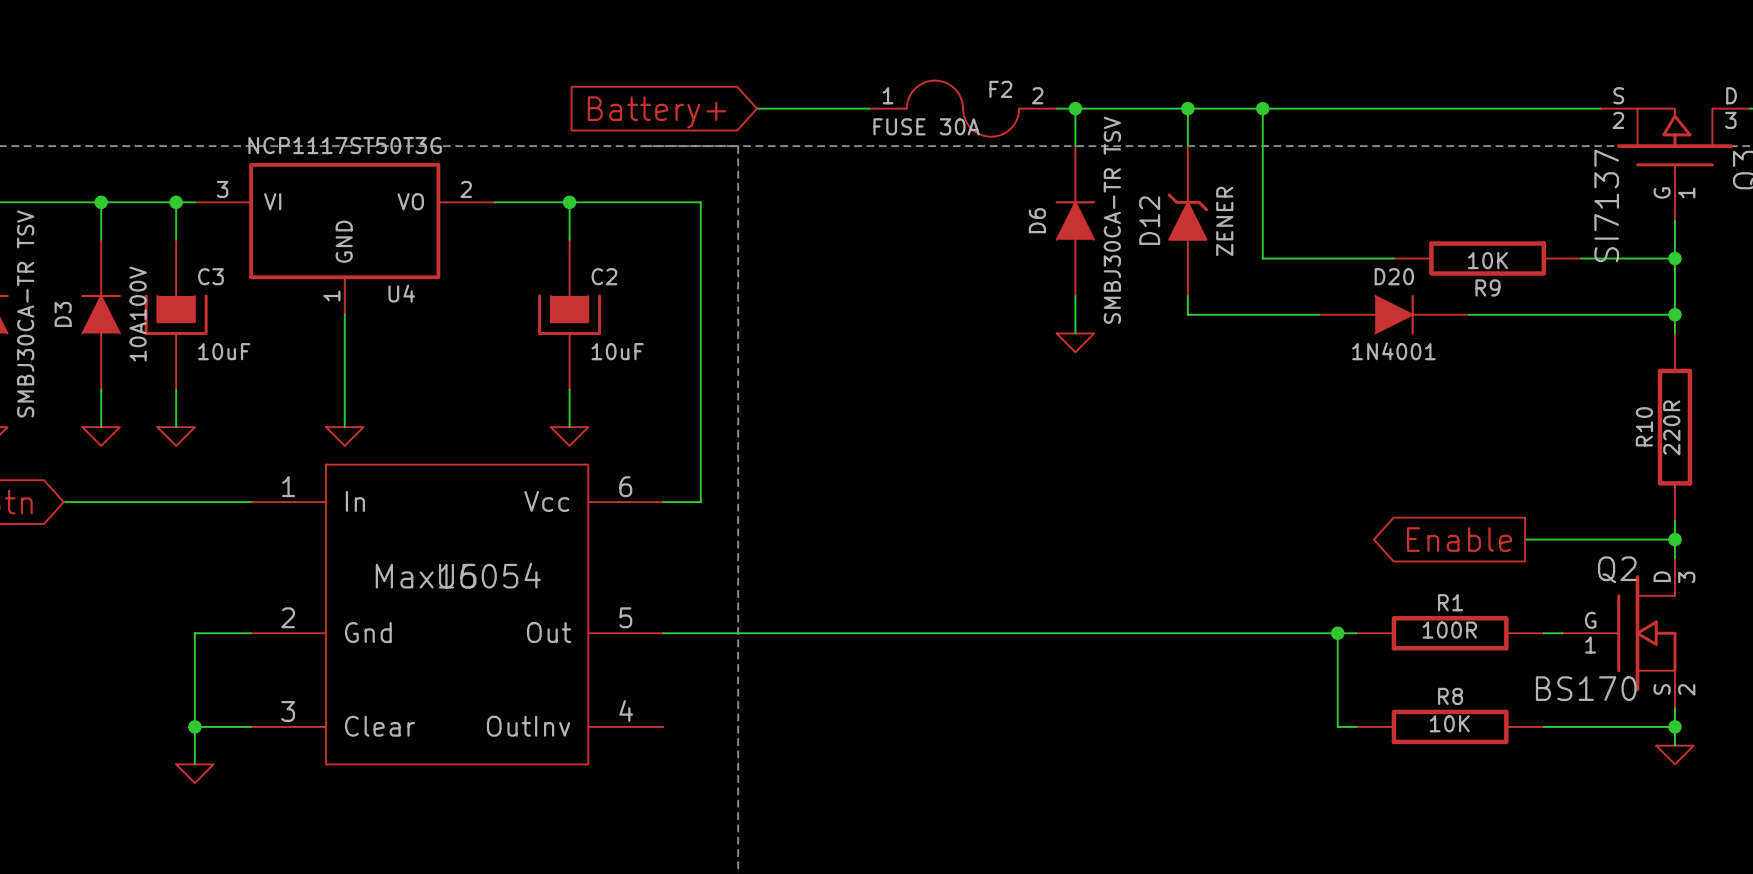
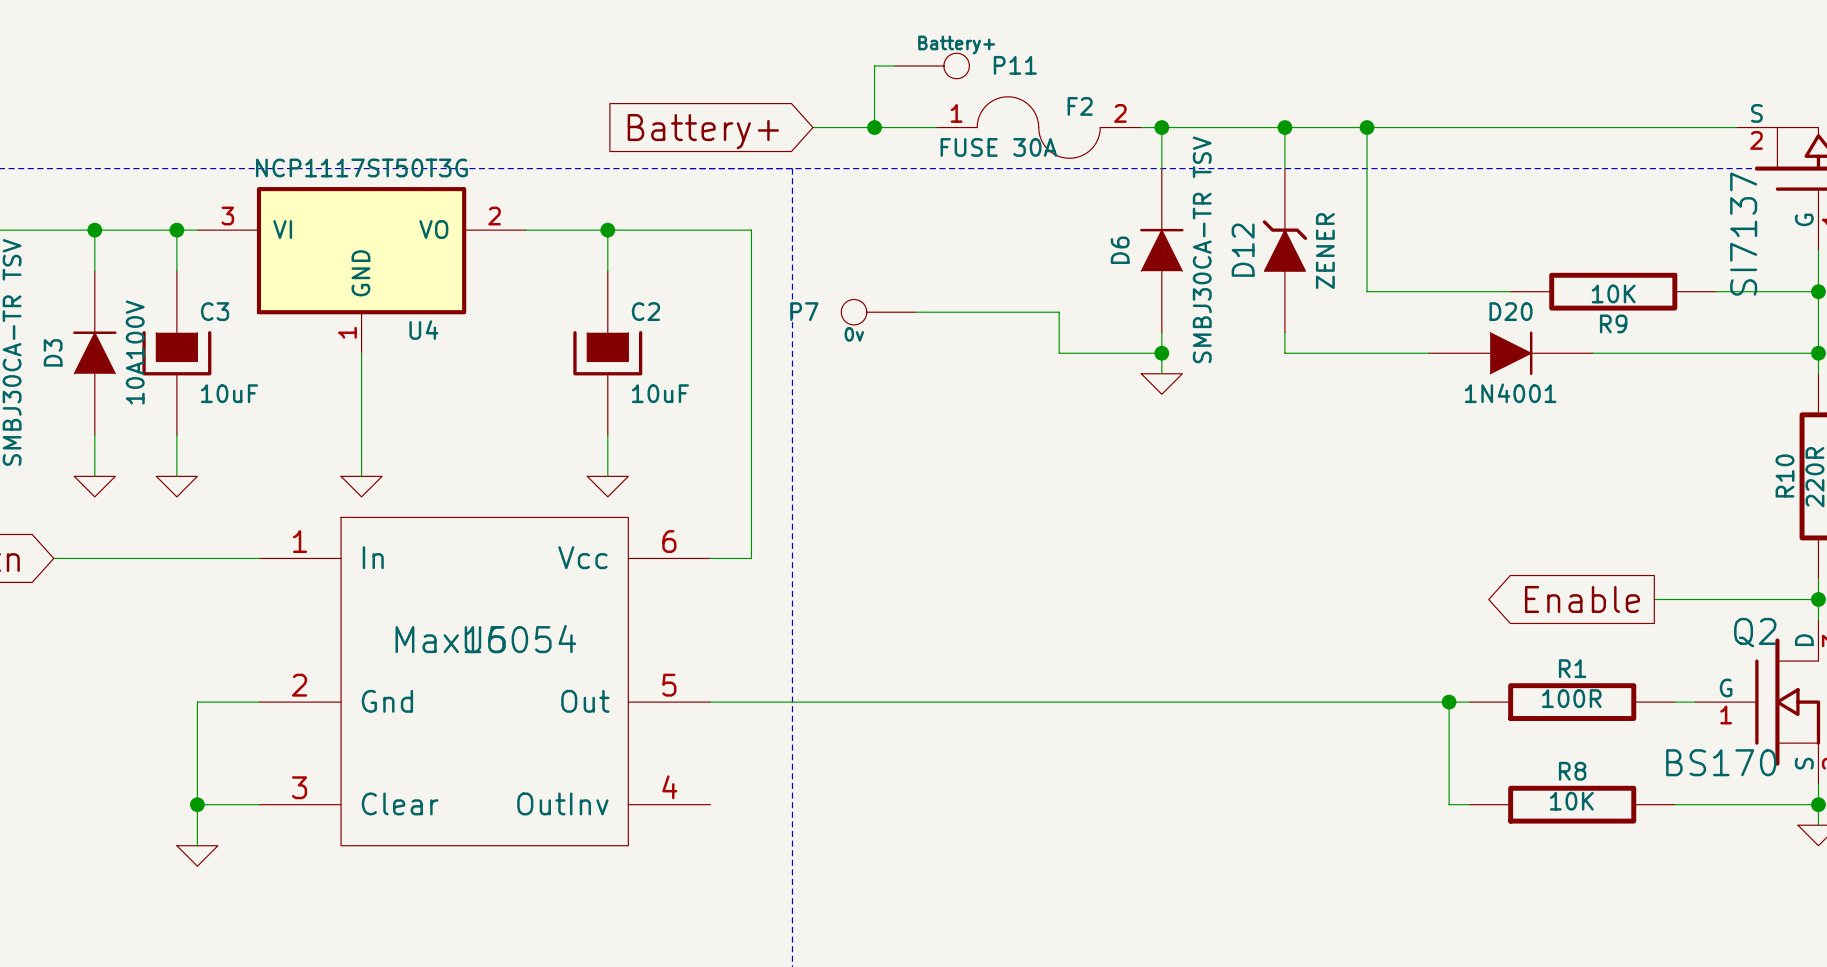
wire: none -> (895, 65) (874, 65) (874, 127)
P11: none -> Battery+ (932, 65)
junction: none -> (874, 127)
P7: none -> 0v (878, 312)
wire: none -> (915, 312) (1059, 312) (1059, 353) (1161, 353)
junction: none -> (1161, 353)

